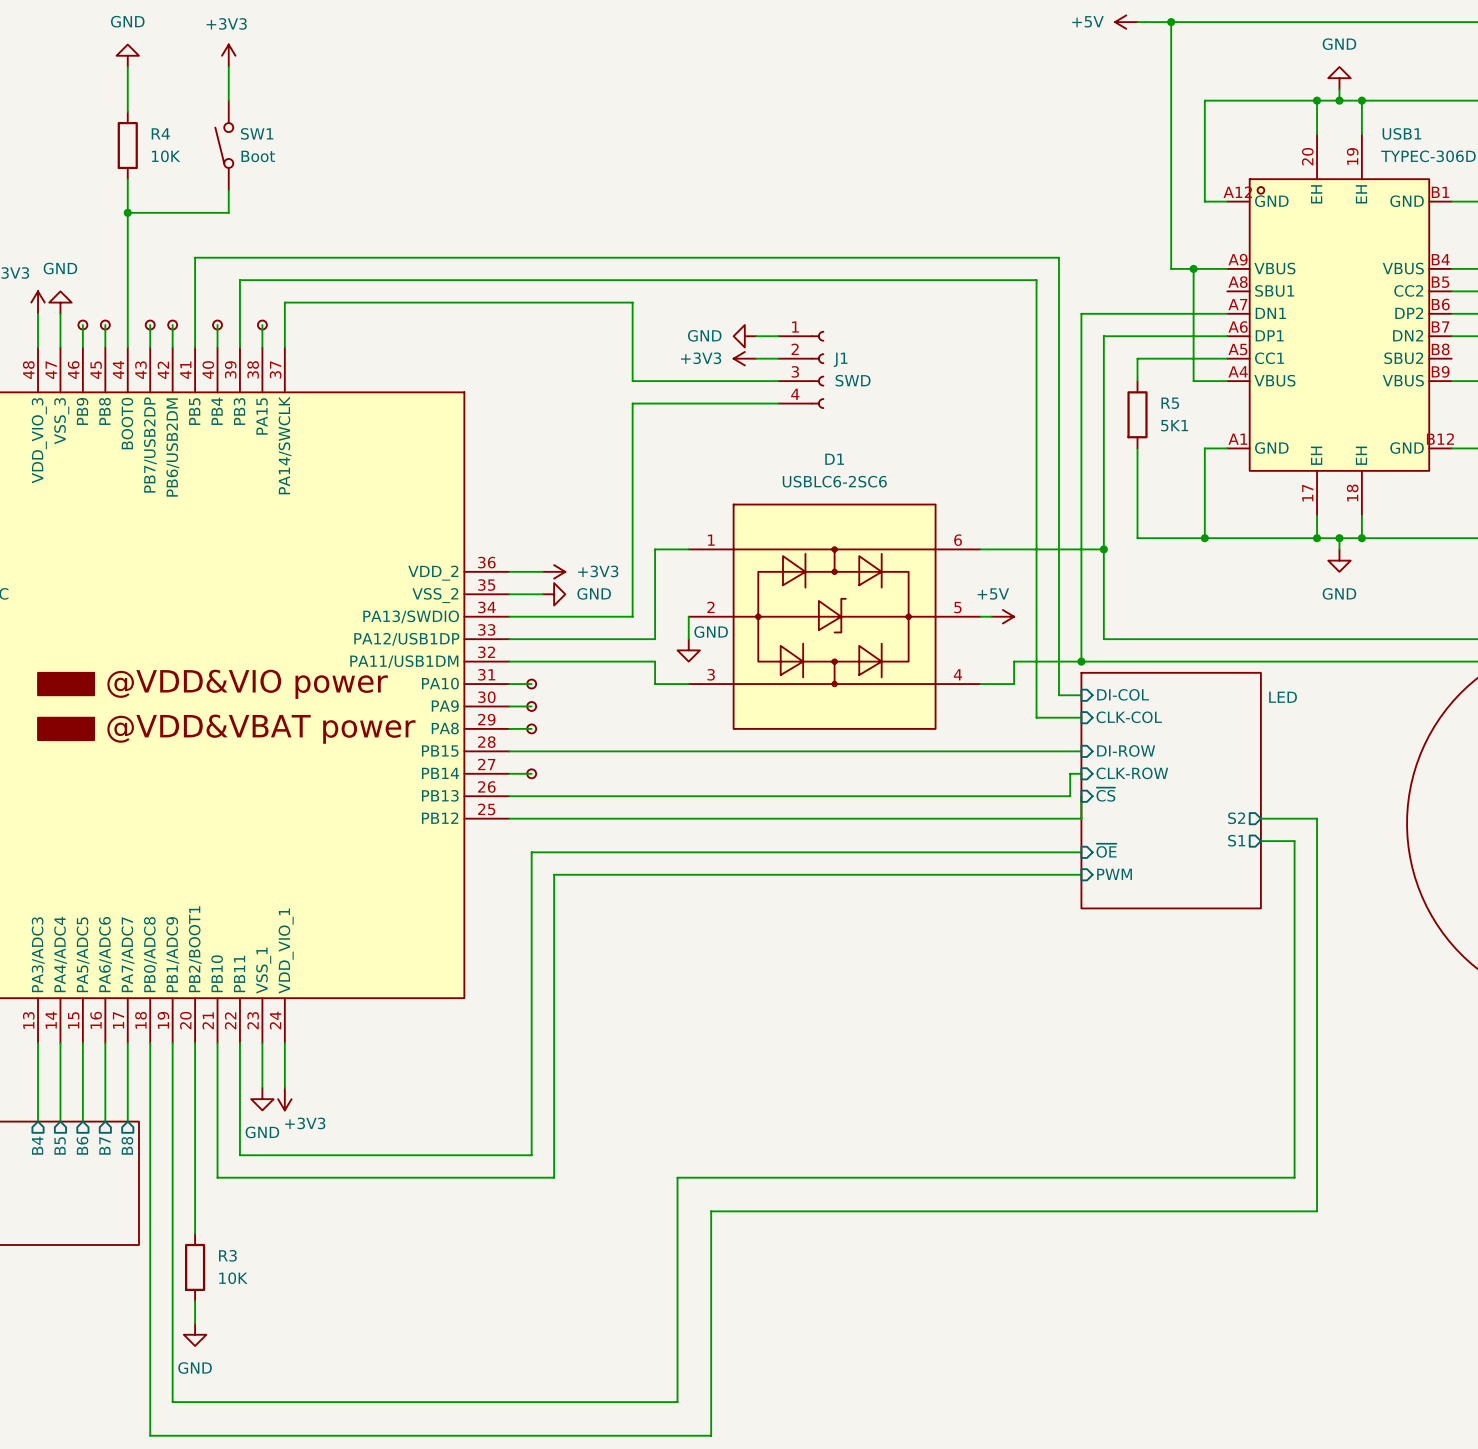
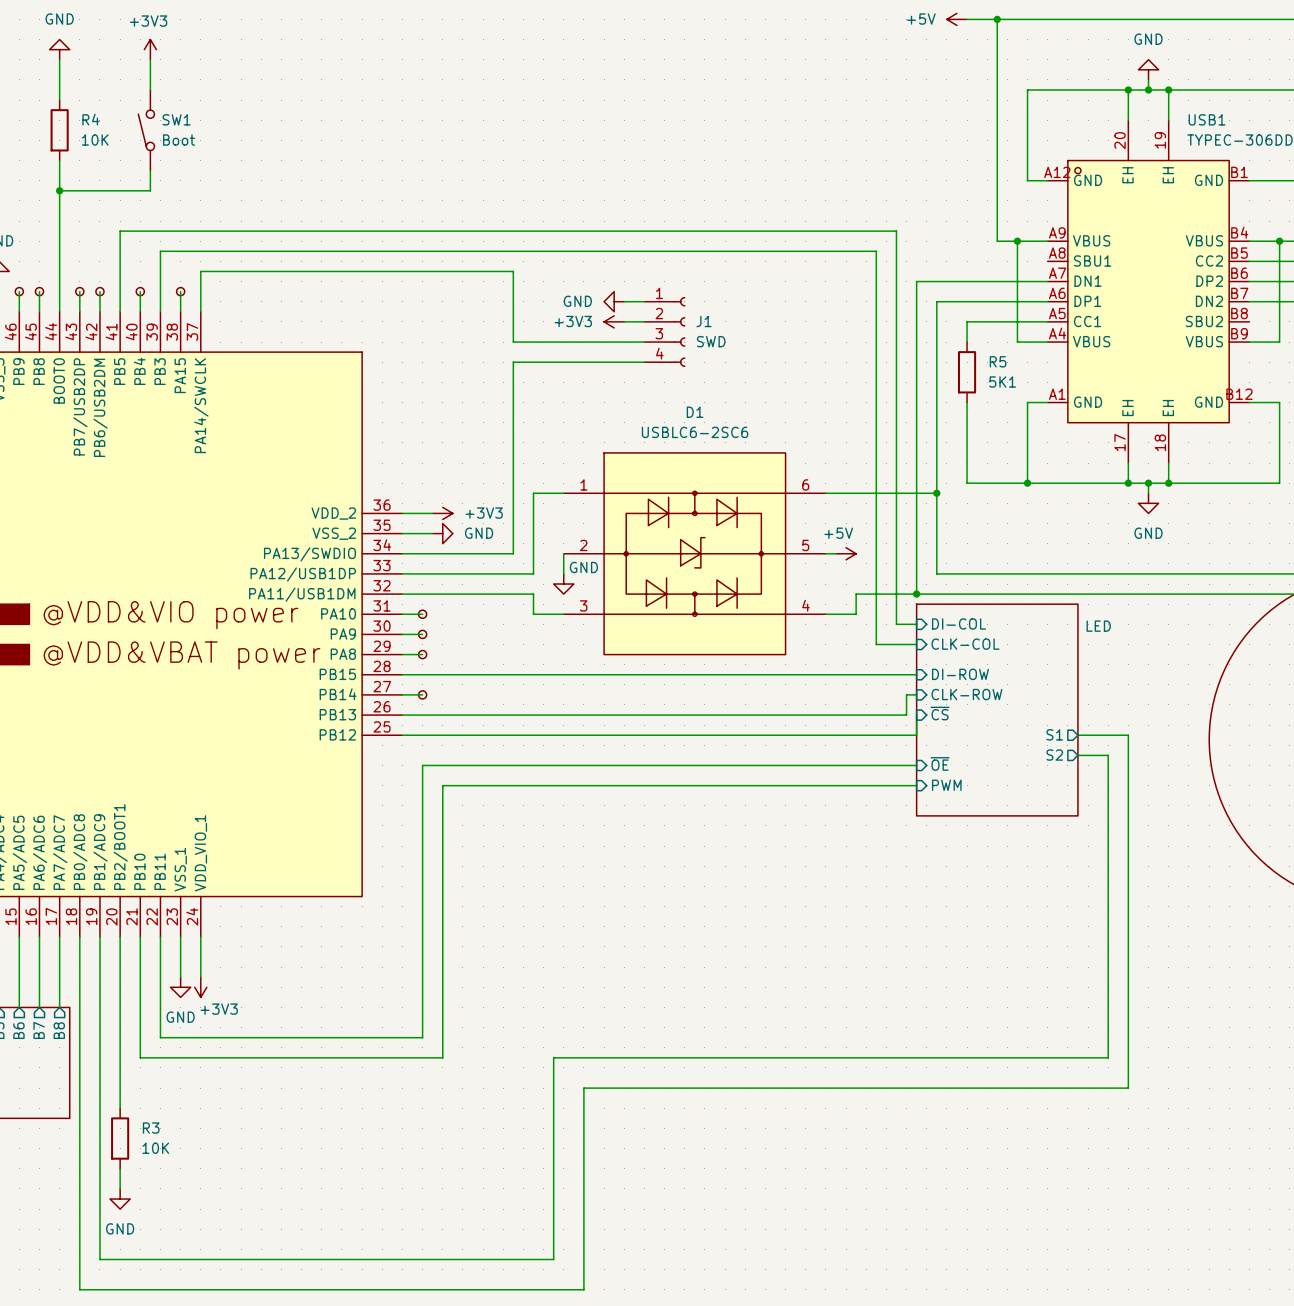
sheet pin: S2 (1236, 818) -> S1 (1054, 734)
sheet pin: S1 (1236, 840) -> S2 (1054, 755)

